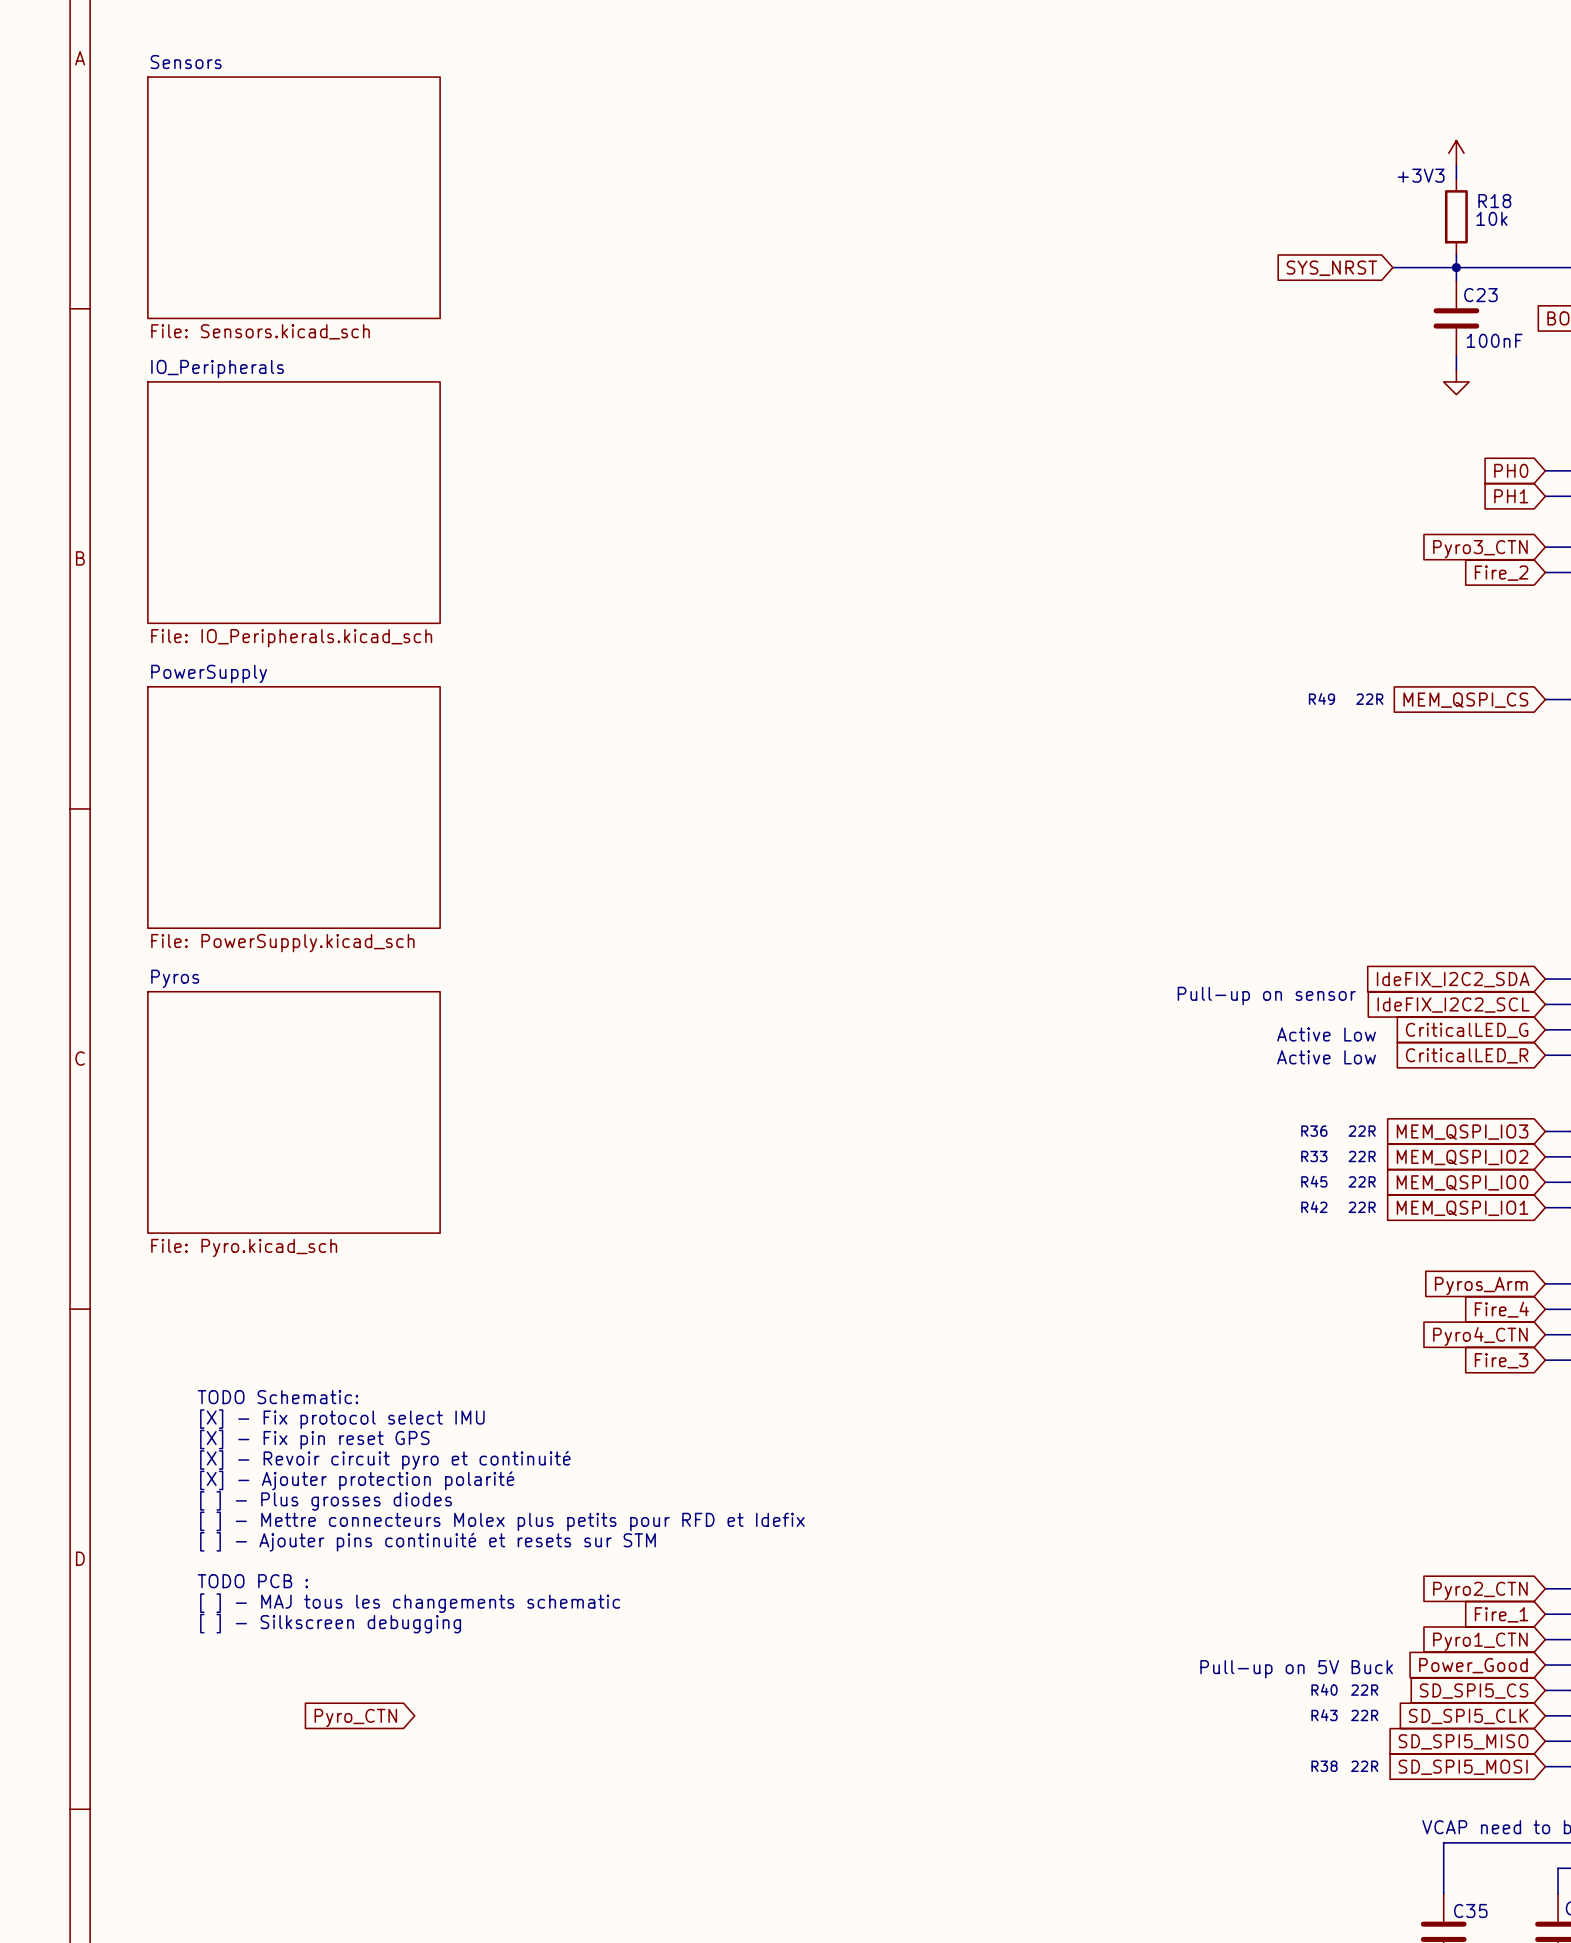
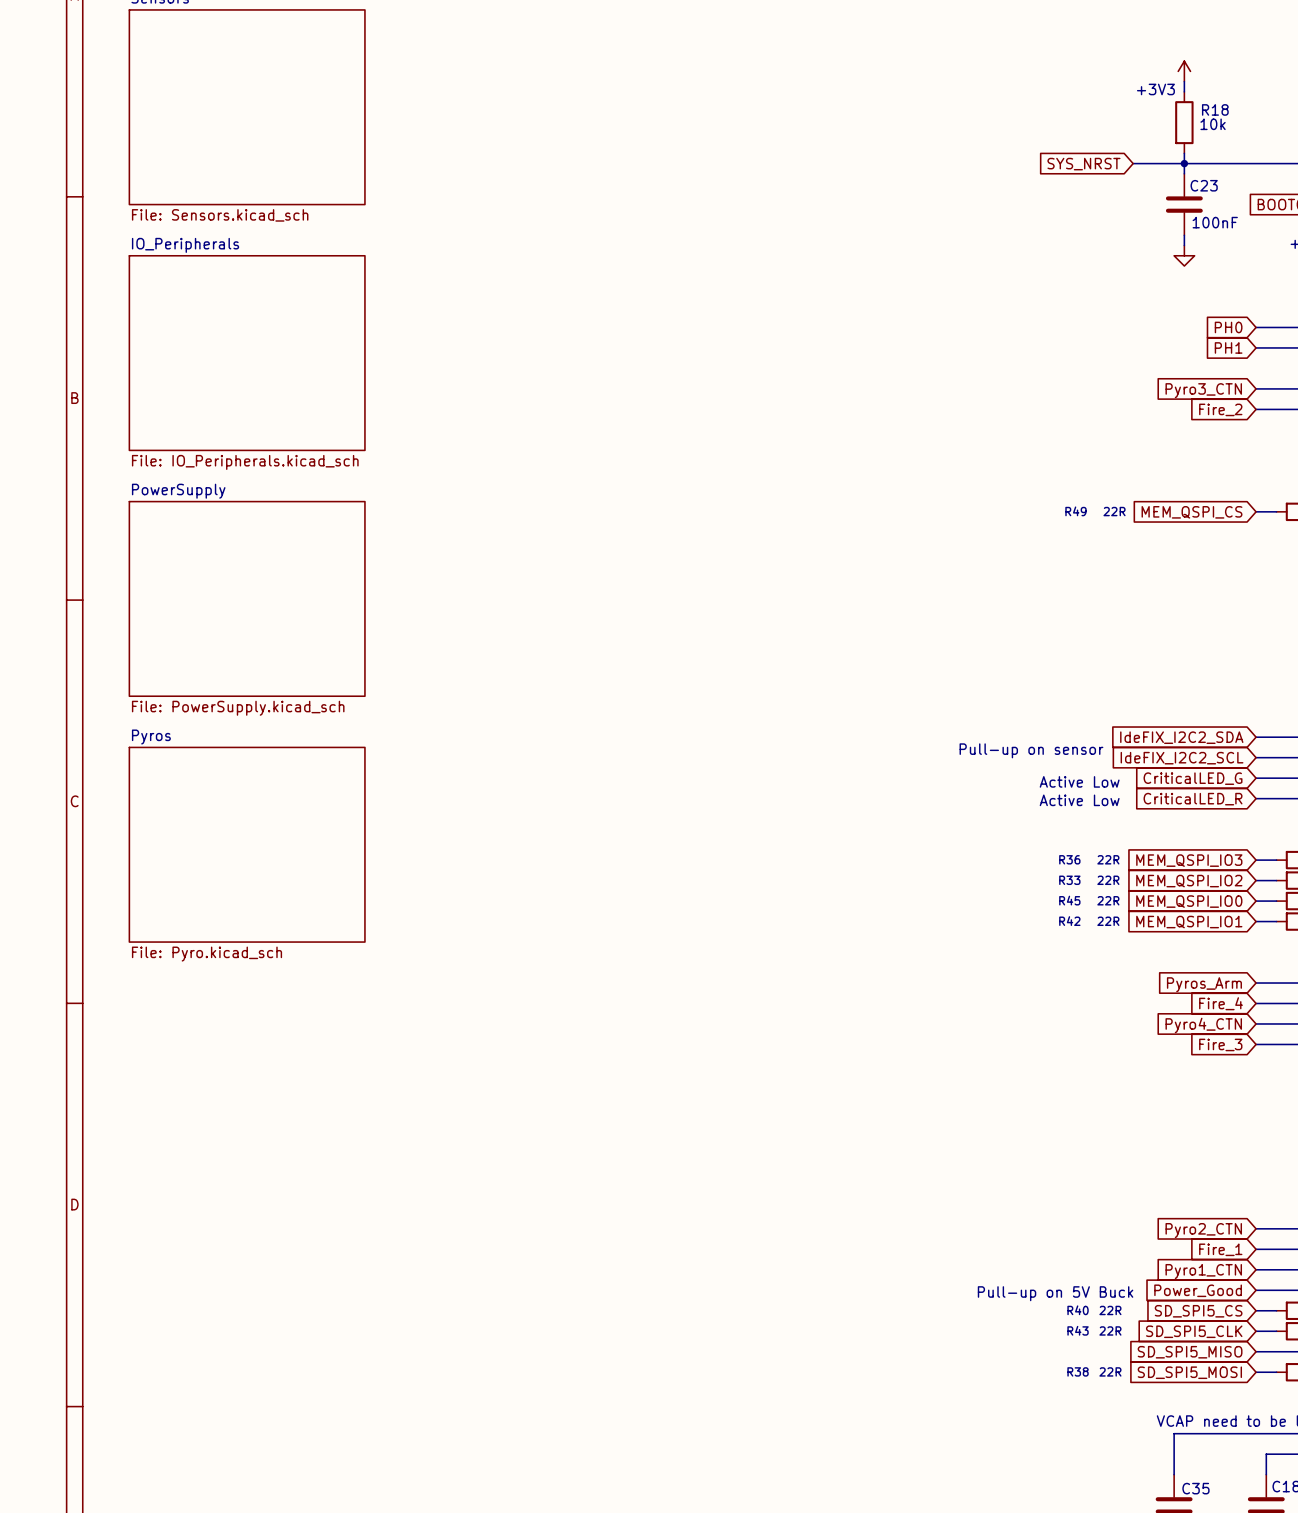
text: TODO Schematic: (277, 1397) -> none
text: [X] - Fix protocol select IMU (342, 1419) -> none
text: [X] - Fix pin reset GPS (314, 1439) -> none
text: [X] - Revoir circuit pyro et continuité (385, 1459) -> none
text: [X] - Ajouter protection polarité (357, 1480) -> none
text: [ ] - Plus grosses diodes (326, 1500) -> none
text: [ ] - Mettre connecteurs Molex plus petits pour RFD et Idefix (502, 1521) -> none
text: [ ] - Ajouter pins continuité et resets sur STM (427, 1541) -> none
text: TODO PCB : (252, 1581) -> none
text: [ ] - MAJ tous les changements schematic (410, 1603) -> none
text: [ ] - Silkscreen debugging (330, 1623) -> none
global label: Pyro_CTN (355, 1717) -> none

